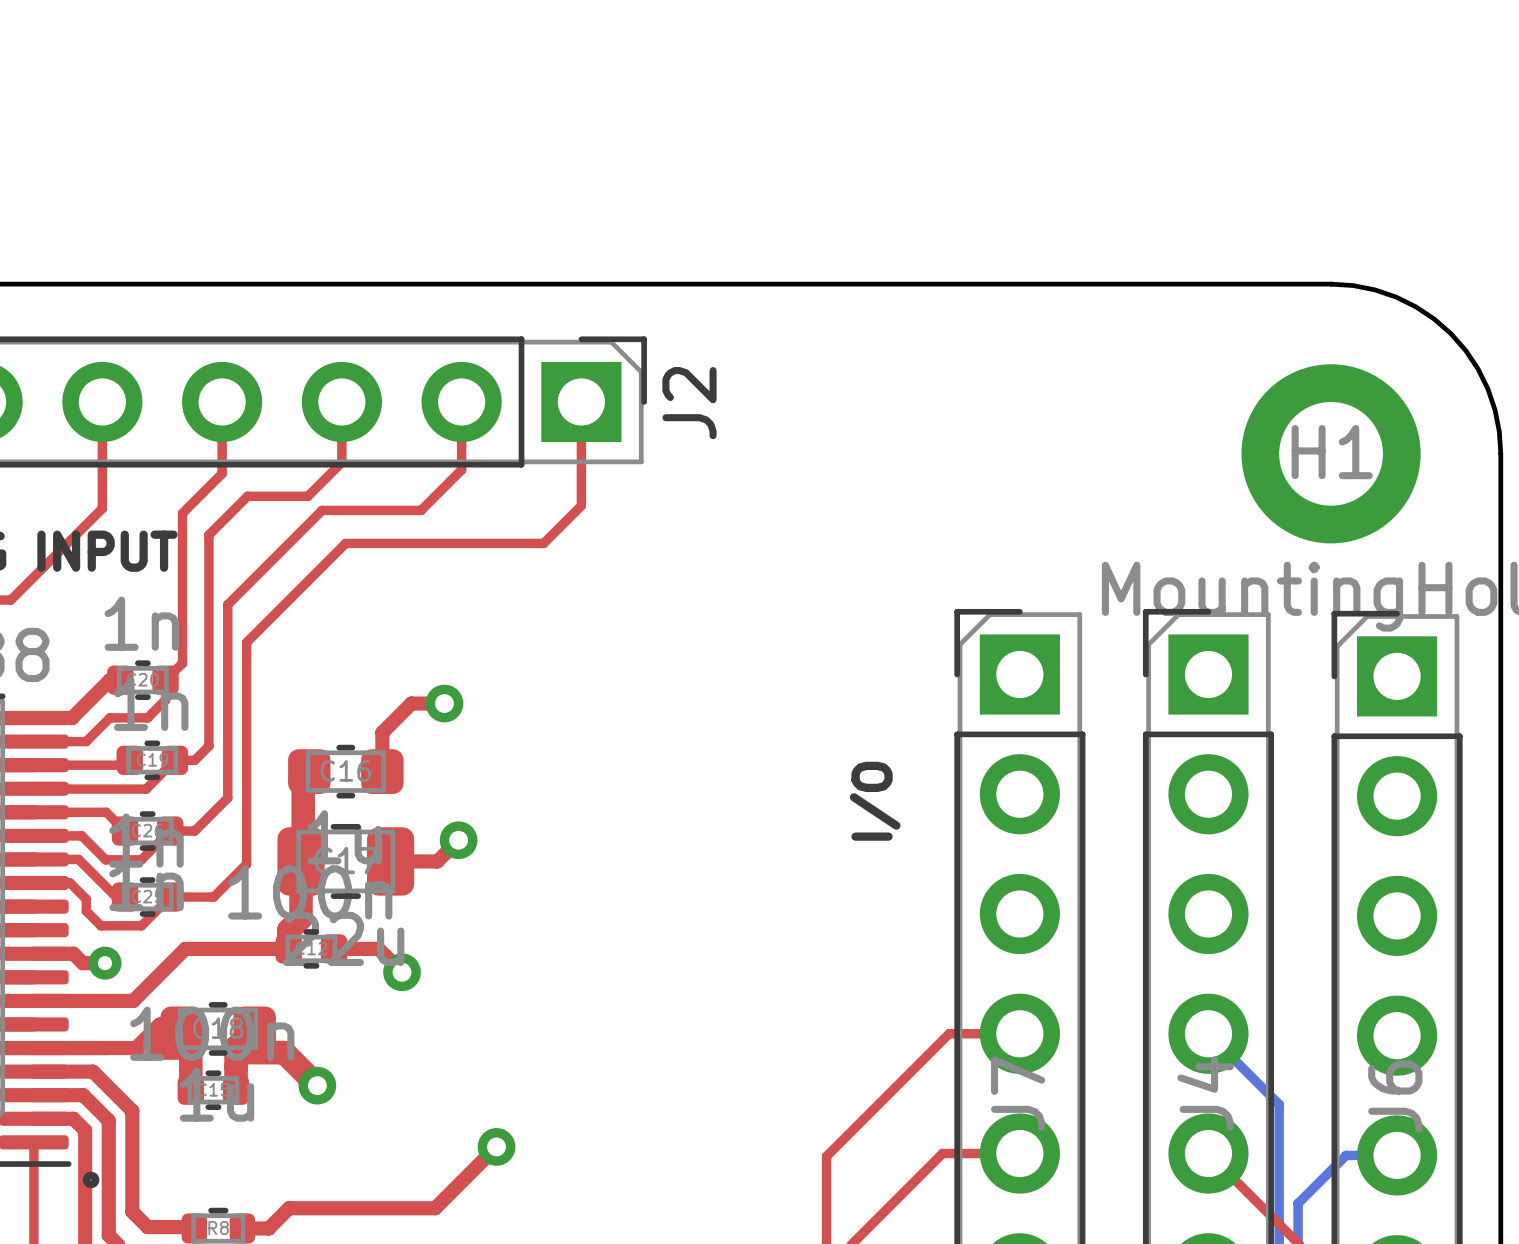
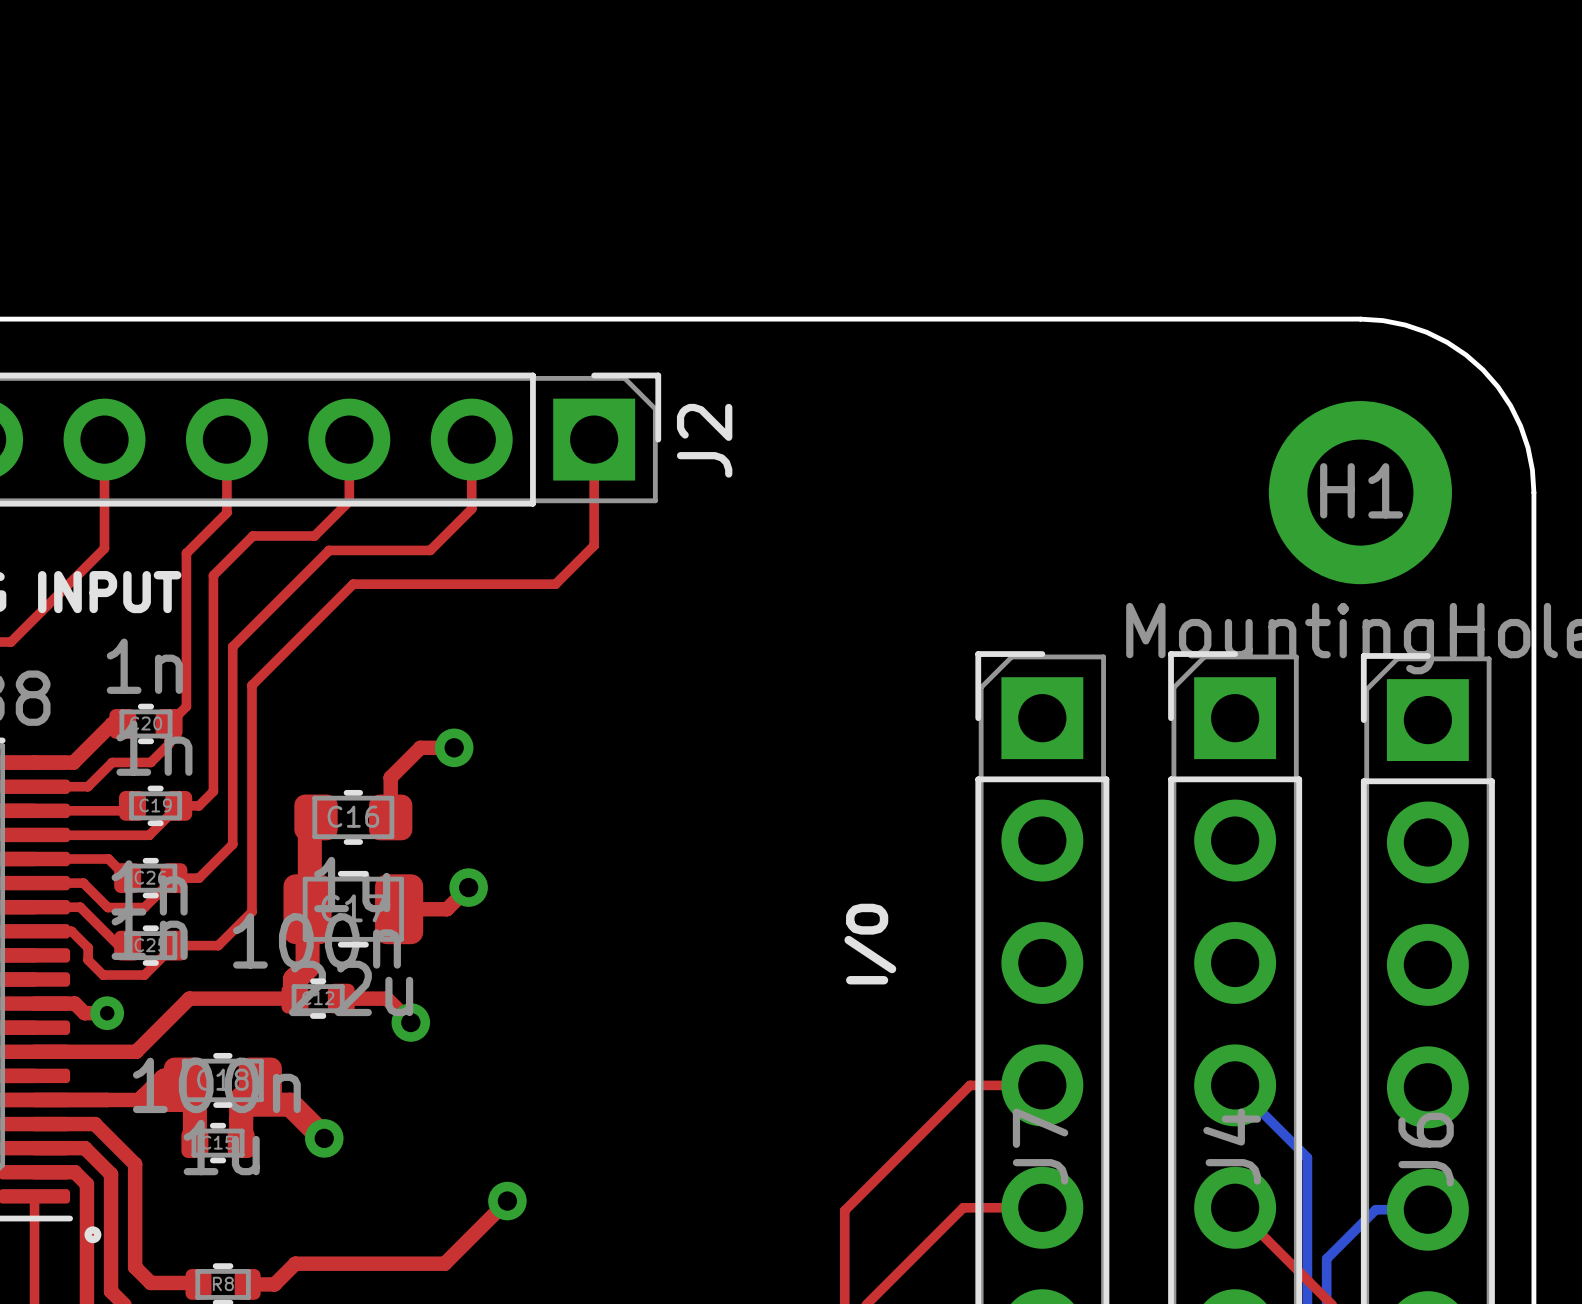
text position: I/O (875, 801) -> I/O (870, 944)

